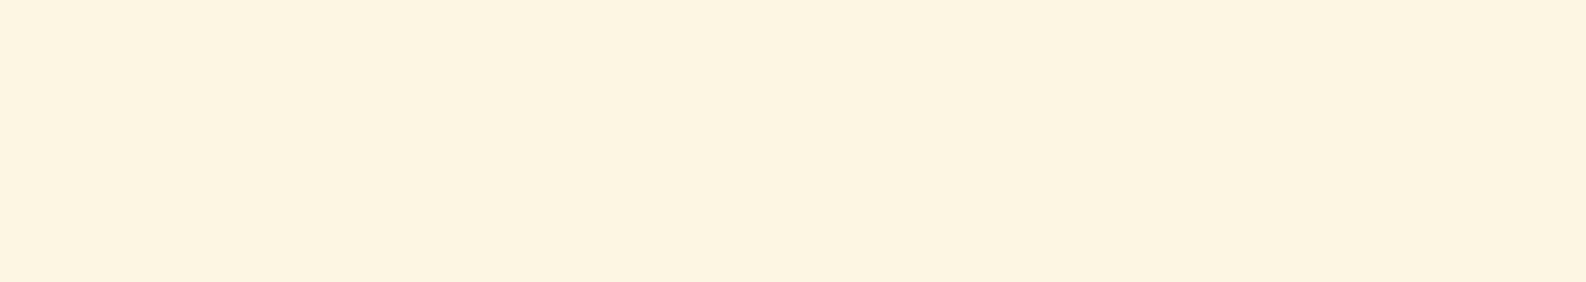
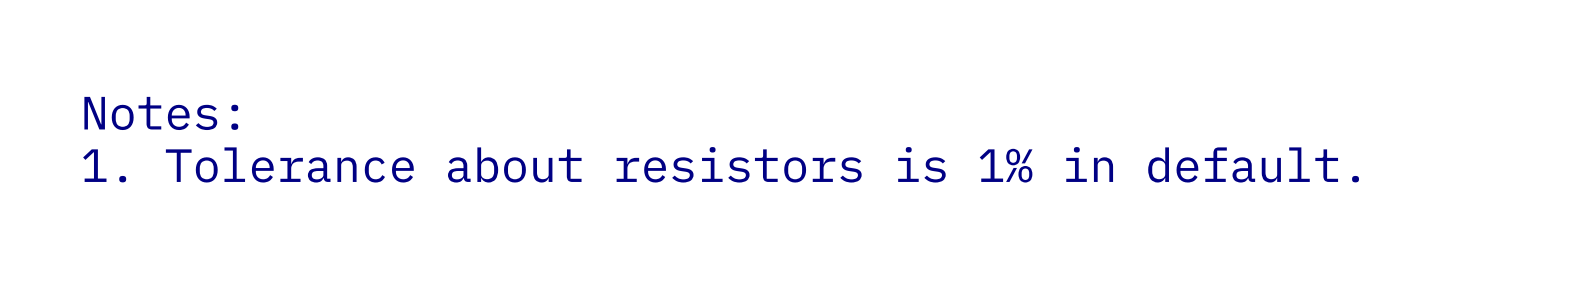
text: none -> Notes: (161, 113)
text: none -> 1. Tolerance about resistors is 1% in default. (721, 164)

